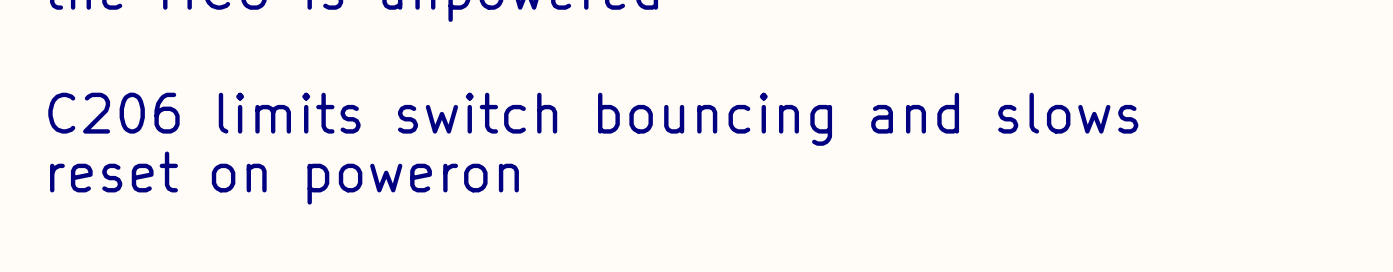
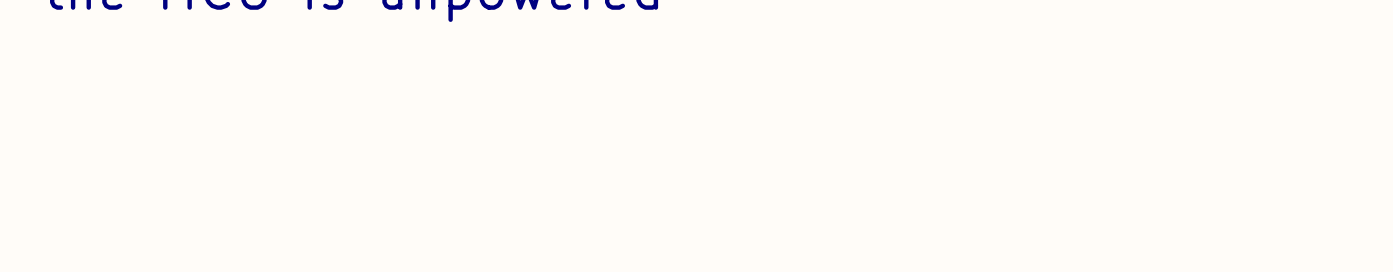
text: C206 limits switch bouncing and slows (593, 119) -> none
text: reset on poweron (284, 178) -> none

